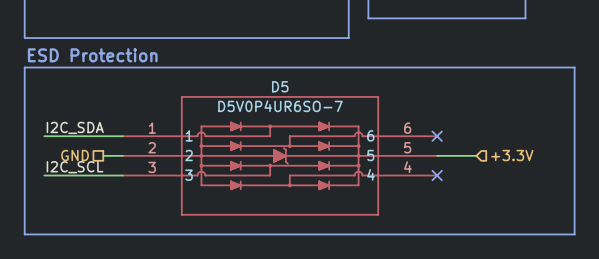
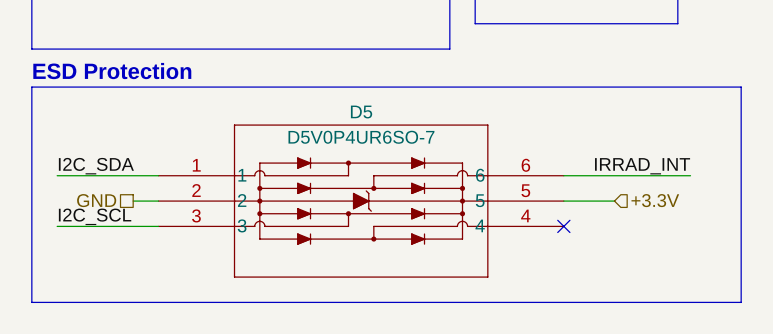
label: none -> IRRAD_INT (642, 166)
wire: none -> (563, 175) (690, 175)
no-connect mark: (437, 136) -> none

